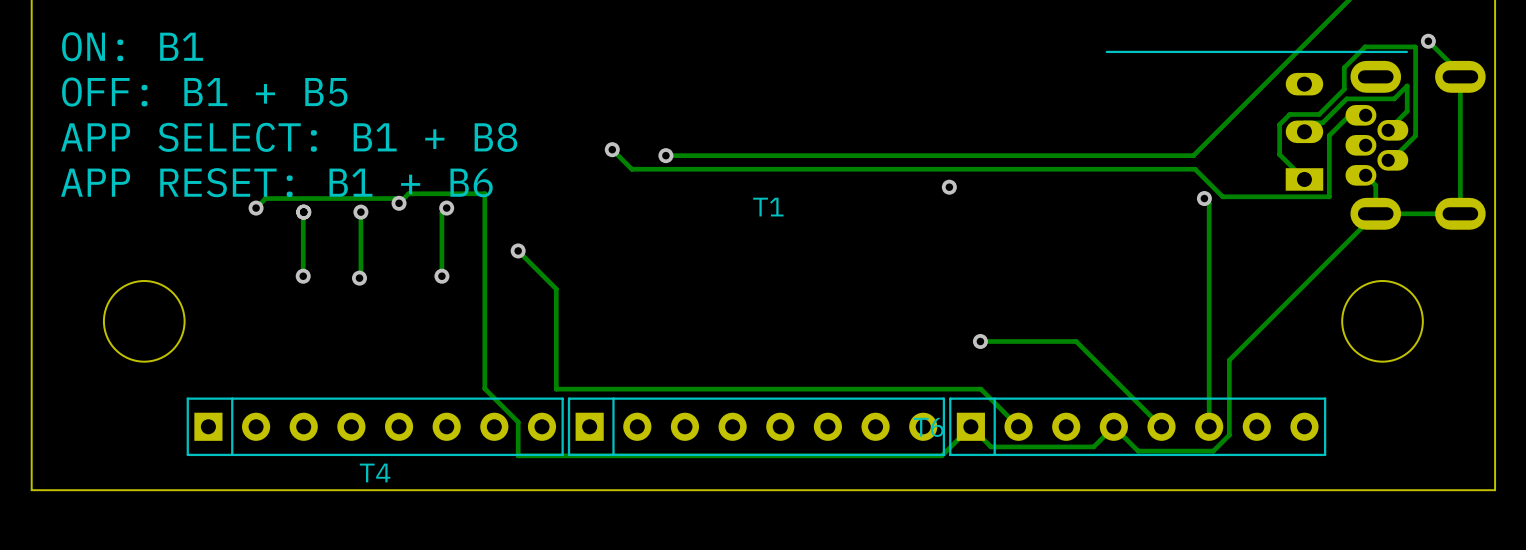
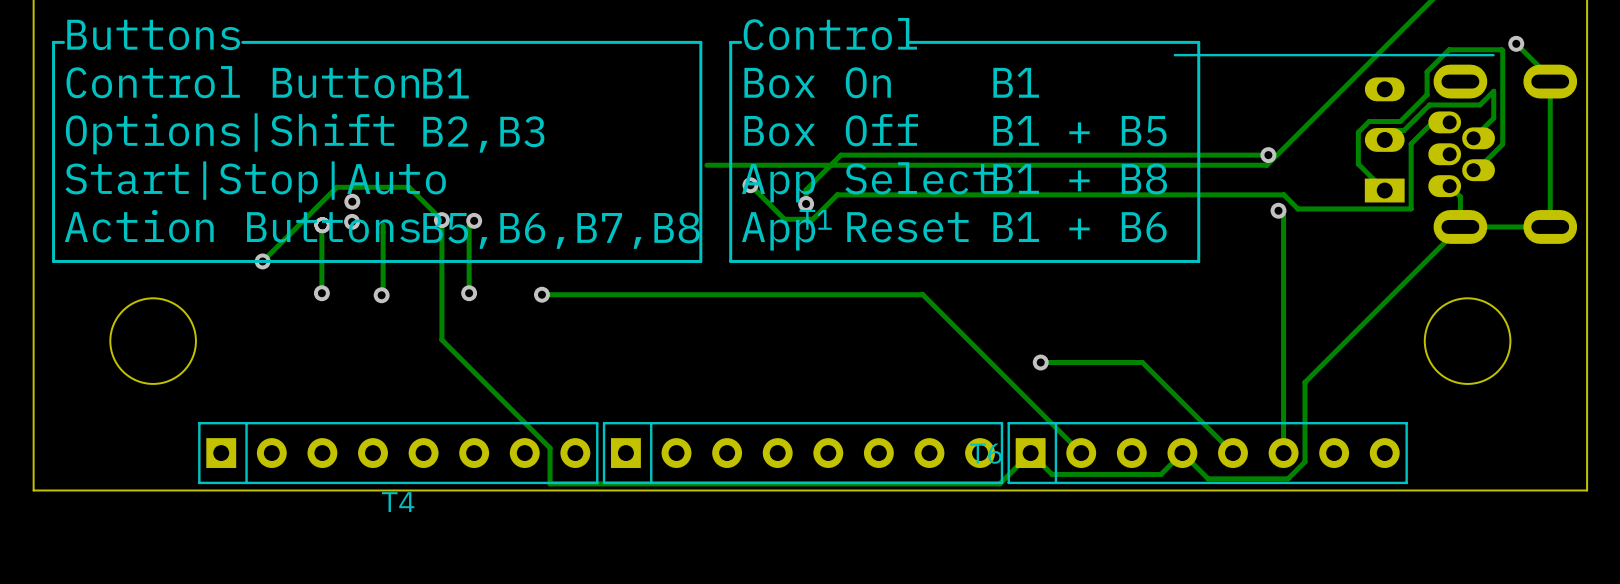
text: none -> Control (830, 34)
line: none -> (242, 42) (700, 42) (700, 261) (53, 261) (53, 42) (63, 42)
line: none -> (909, 42) (1198, 42) (1198, 261) (730, 261) (730, 42) (740, 42)
text: ON: B1 (132, 46) -> Buttons (153, 34)
text: none -> Box On (817, 82)
text: none -> B1 (1016, 82)
text: none -> B1 (446, 83)
text: OFF: B1 + B5 (204, 92) -> Control Button (242, 82)
text: none -> Box Off (831, 130)
text: none -> B1 + B5 (1079, 131)
text: none -> B2,B3 (483, 134)
text: APP SELECT: B1 + B8 (289, 137) -> Options|Shift (230, 133)
track: none -> (1268, 155) (840, 155) (806, 189) (806, 203)
via: none -> (1268, 155)
track: (612, 149) (631, 169) (1195, 169) (1209, 183) -> (750, 185) (784, 219) (812, 219) (837, 194) (1283, 194)
via: (612, 149) -> none
via position: (665, 155) -> (750, 185)
text: none -> B1 + B8 (1080, 178)
text: none -> App Select (868, 182)
text: APP RESET: B1 + B6 (276, 182) -> Start|Stop|Auto (255, 181)
via: (949, 187) -> none
via: none -> (352, 201)
via: none -> (806, 203)
via position: (399, 203) -> (441, 220)
track: (256, 208) (265, 198) (394, 198) (399, 203) (408, 193) (484, 193) (484, 388) -> (262, 261) (336, 187) (409, 187) (441, 220) (441, 339) (514, 412)
via: (256, 208) -> none
via: none -> (352, 221)
via: (360, 212) -> none
text: none -> Action Buttons (242, 226)
text: none -> B1 + B6 (1080, 227)
text: none -> B5,B6,B7,B8 (561, 230)
text: none -> App Reset (855, 231)
via: none -> (262, 261)
track: (518, 250) (556, 289) (556, 389) (980, 389) -> (541, 294) (922, 294) (1041, 413)
via position: (518, 250) -> (541, 294)
board edge: (1495, 462) (1495, 490) (31, 490) (31, 462) -> (1587, 490) (33, 490)

